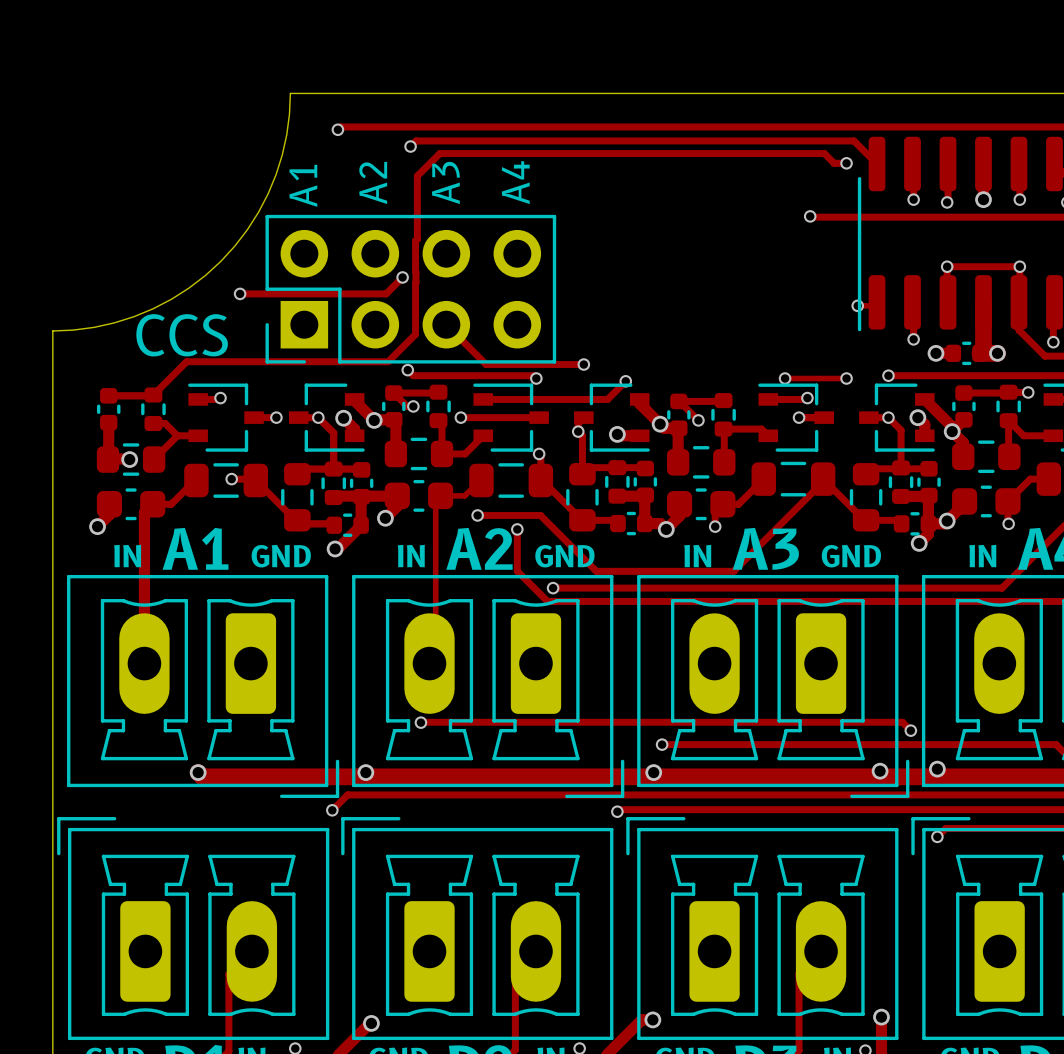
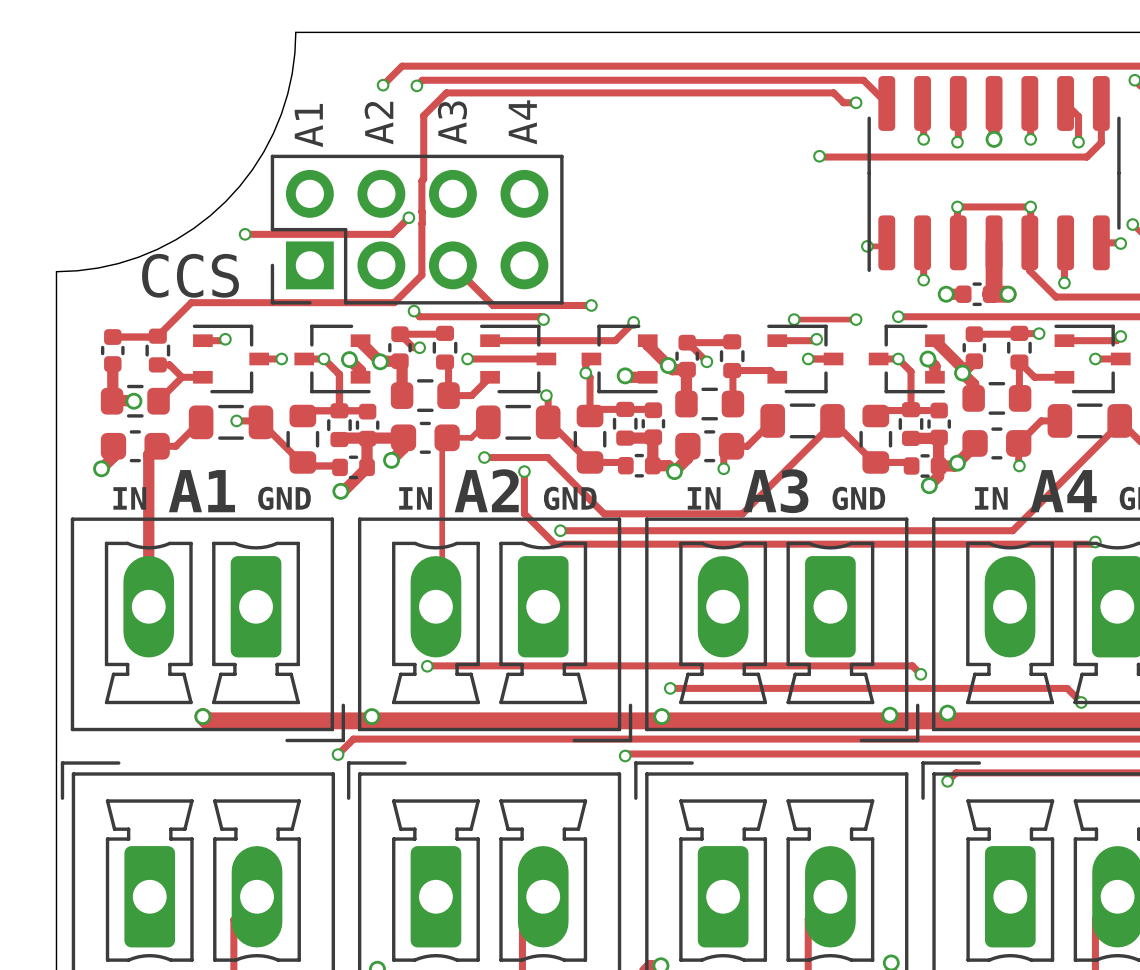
track: (395, 126) (340, 126) (337, 129) -> (402, 66) (383, 85)
via position: (337, 129) -> (383, 85)

